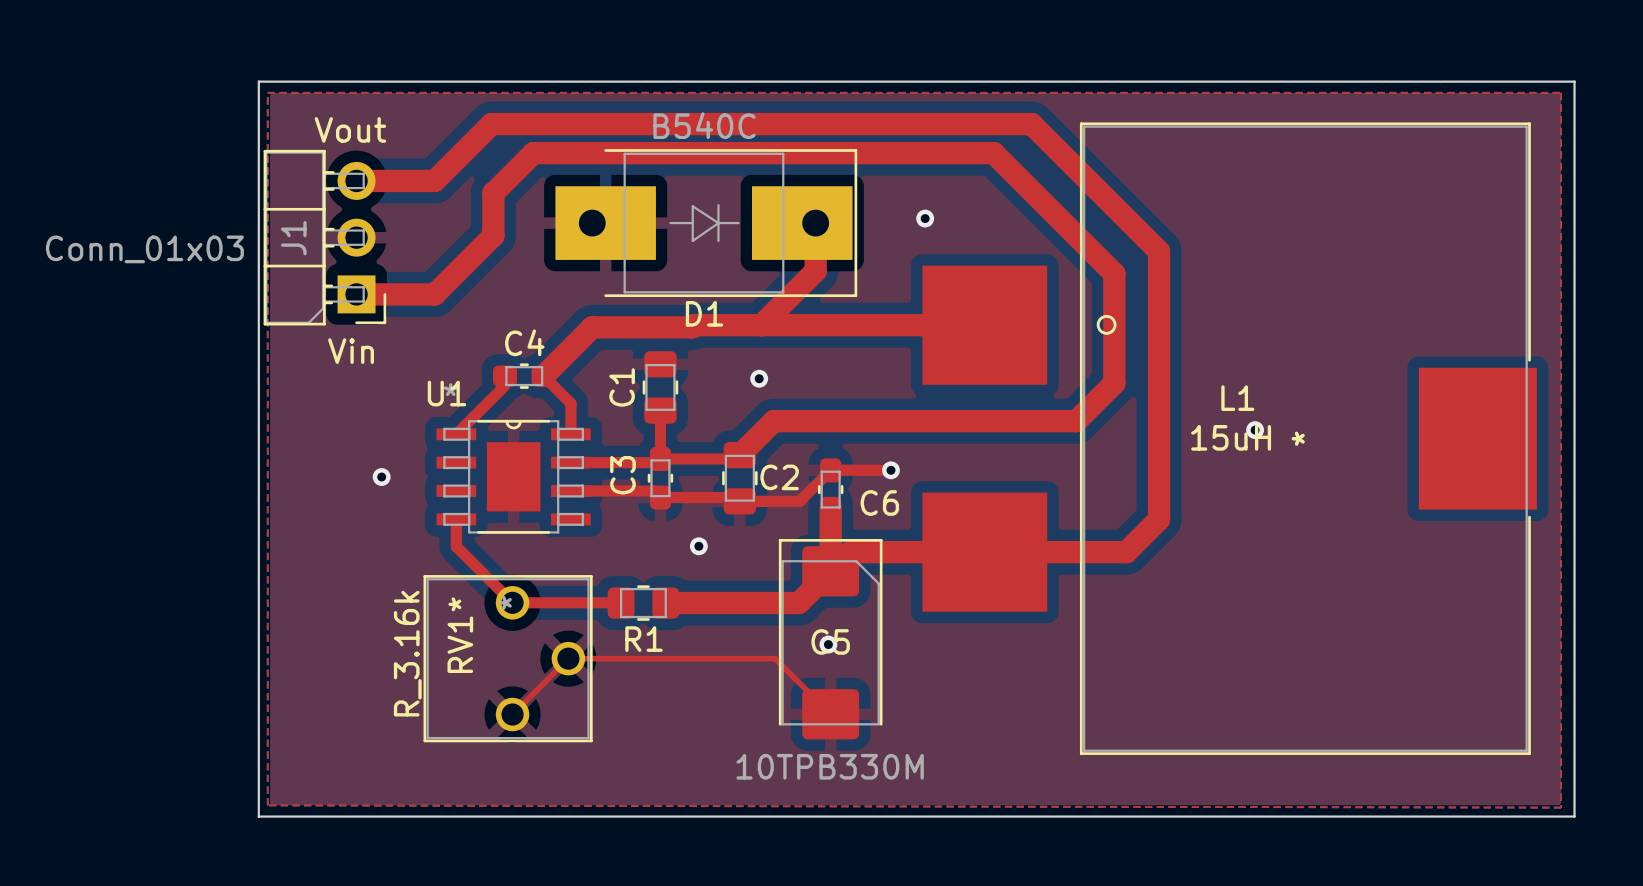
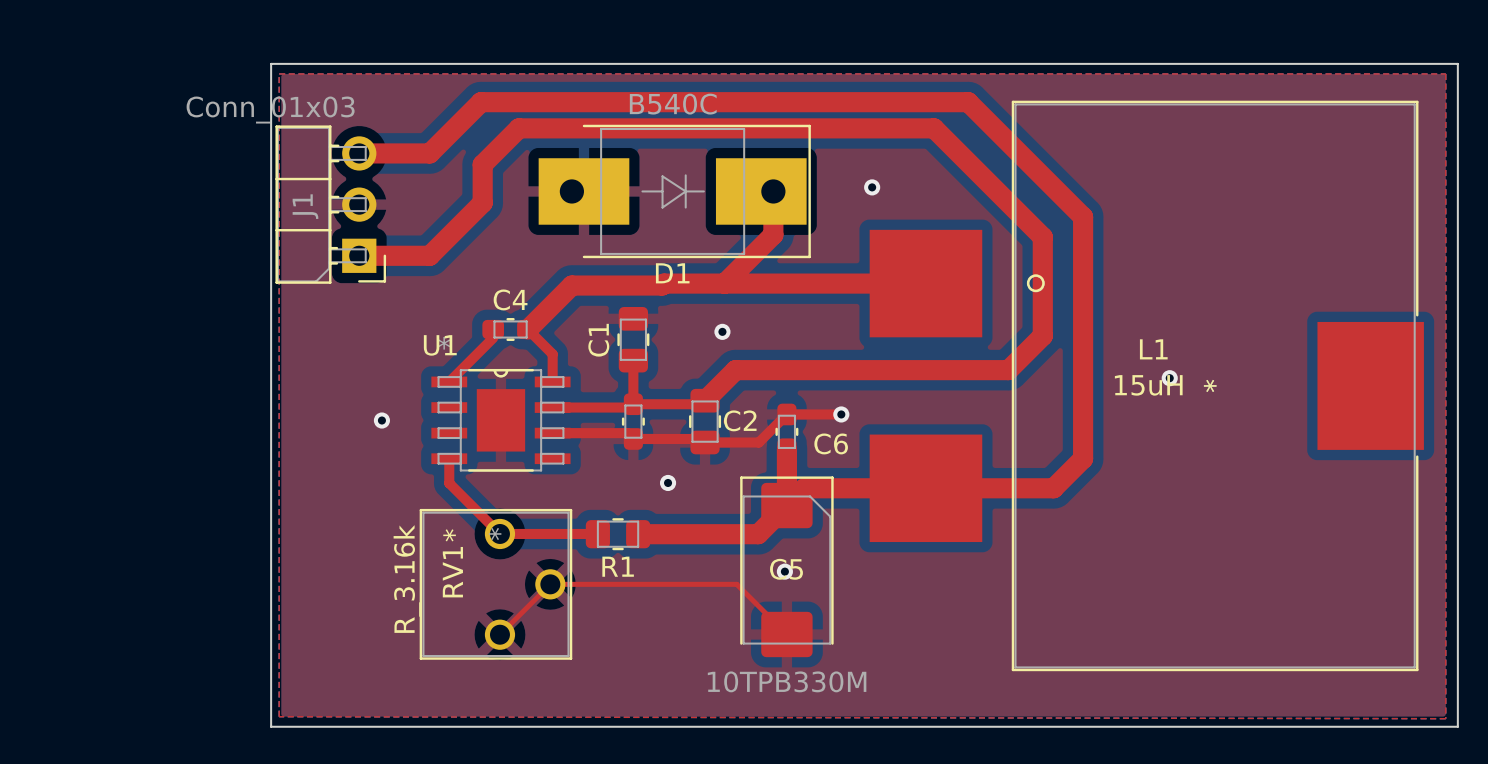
text: Vout (350, 129) -> none
J1 value position: Conn_01x03 (144, 249) -> Conn_01x03 (270, 110)
text: Vin (351, 351) -> none
C3 name: C3 (622, 475) -> none

